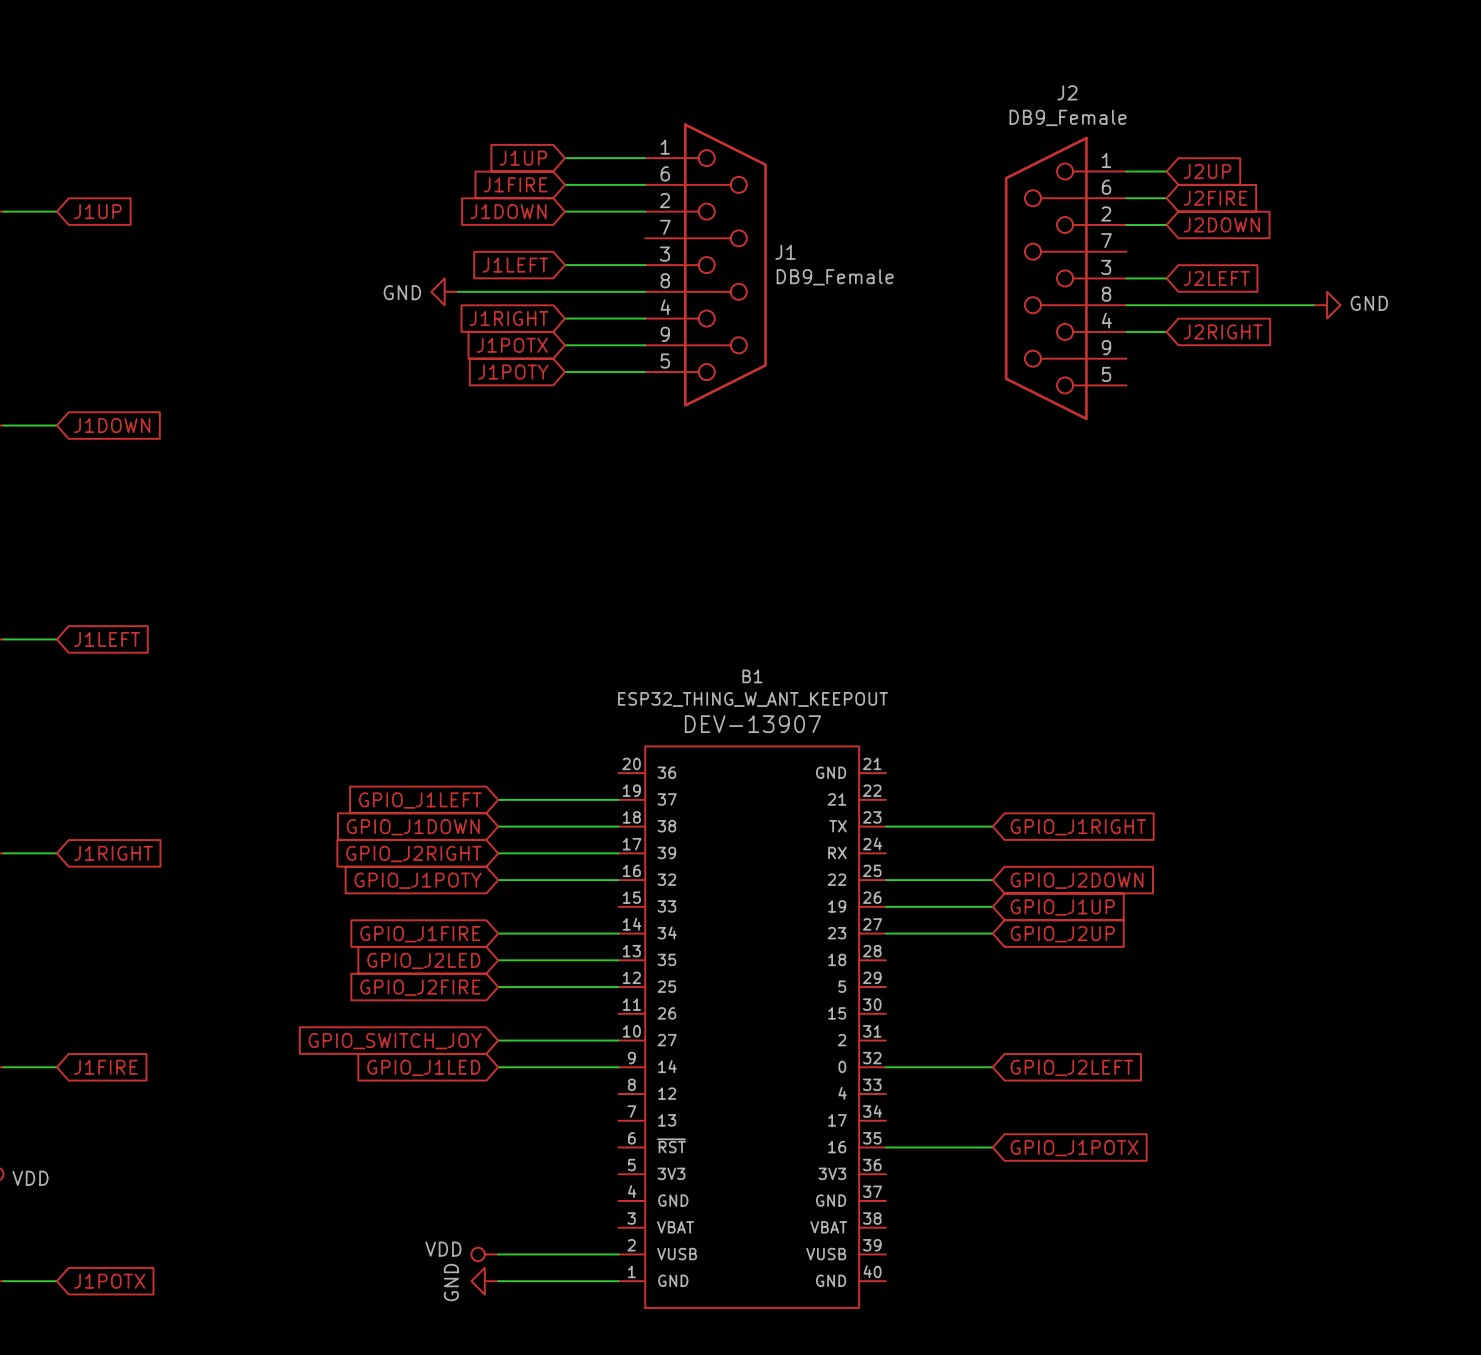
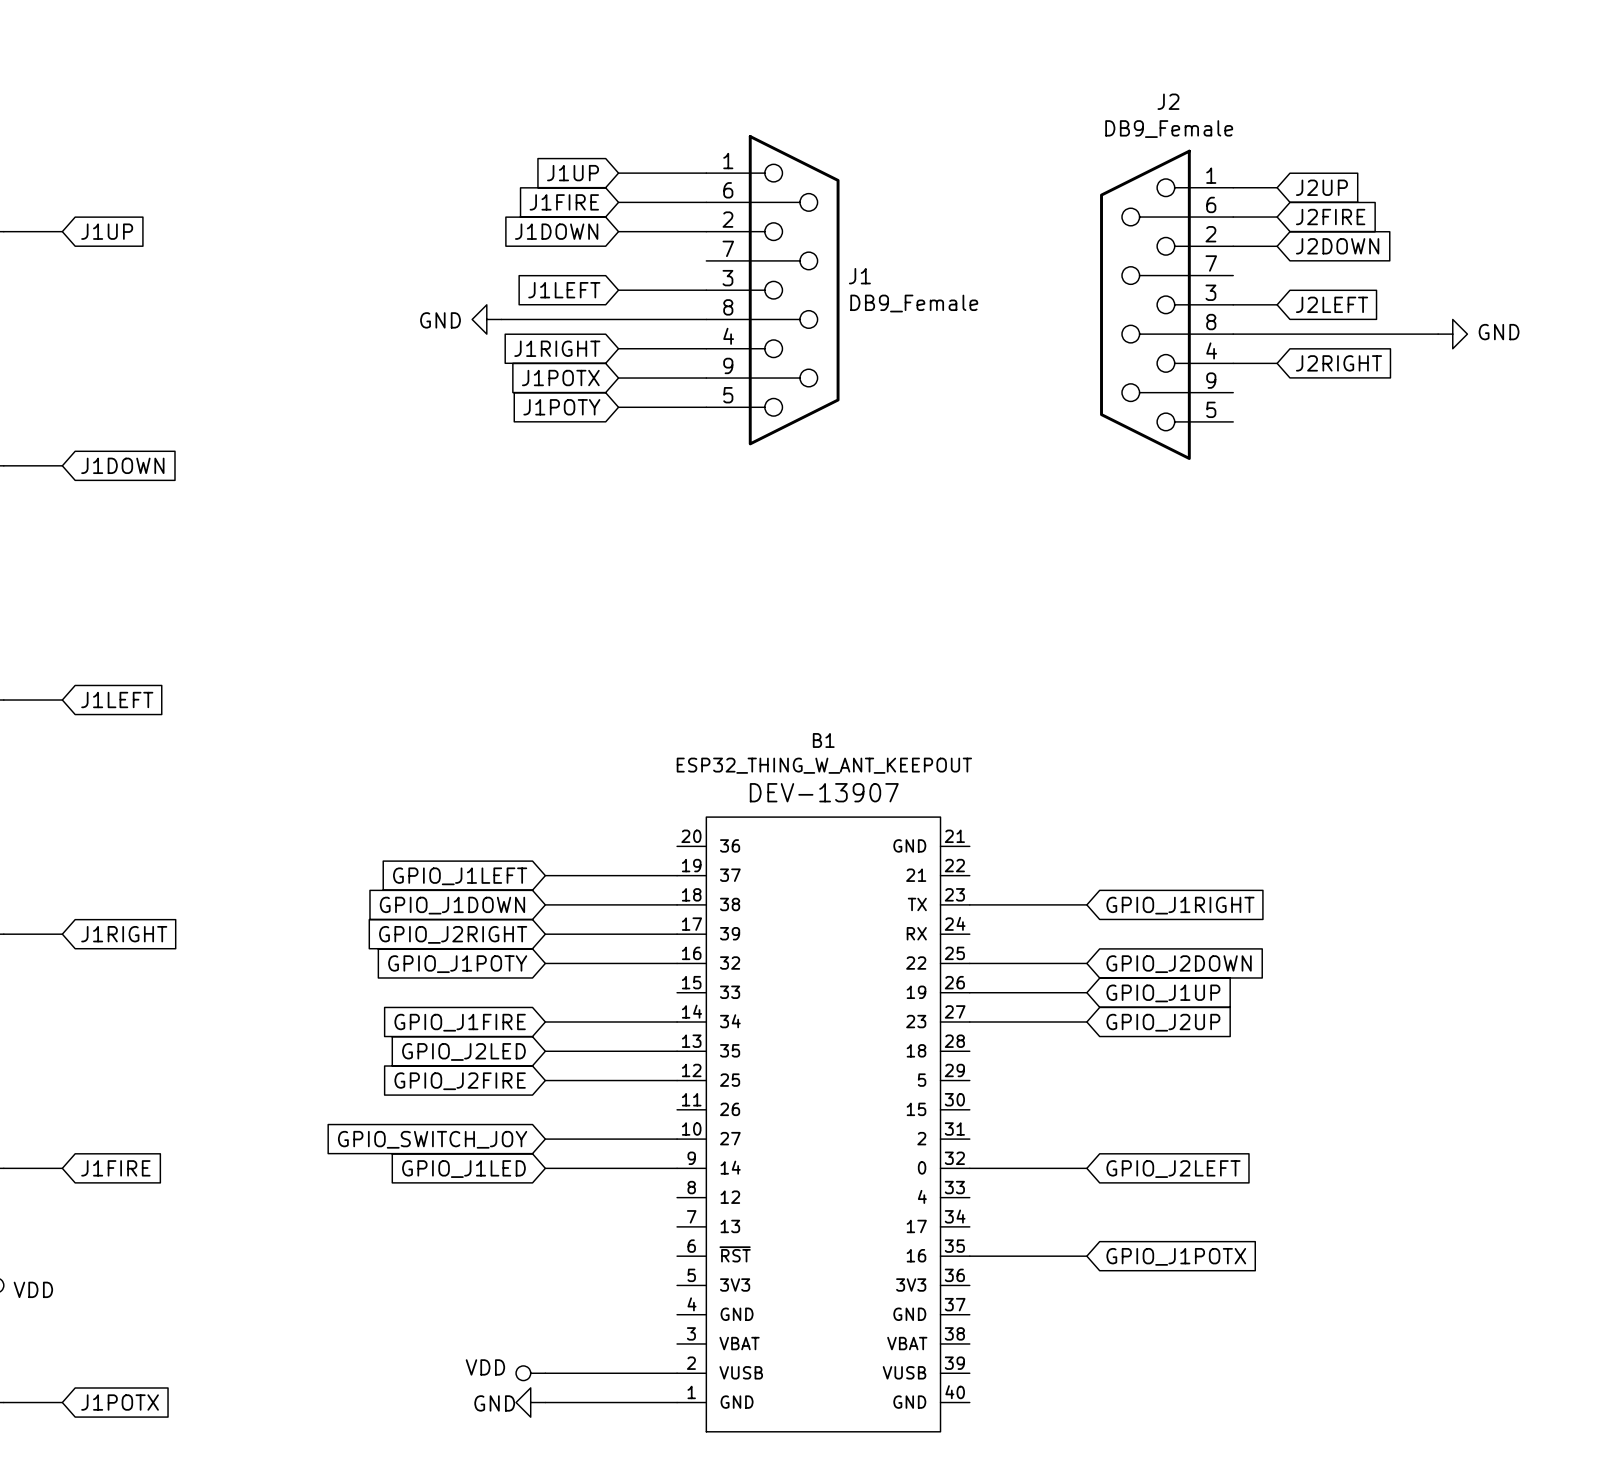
power symbol text rotation: 0° (451, 1282) -> 90° clockwise (494, 1403)

